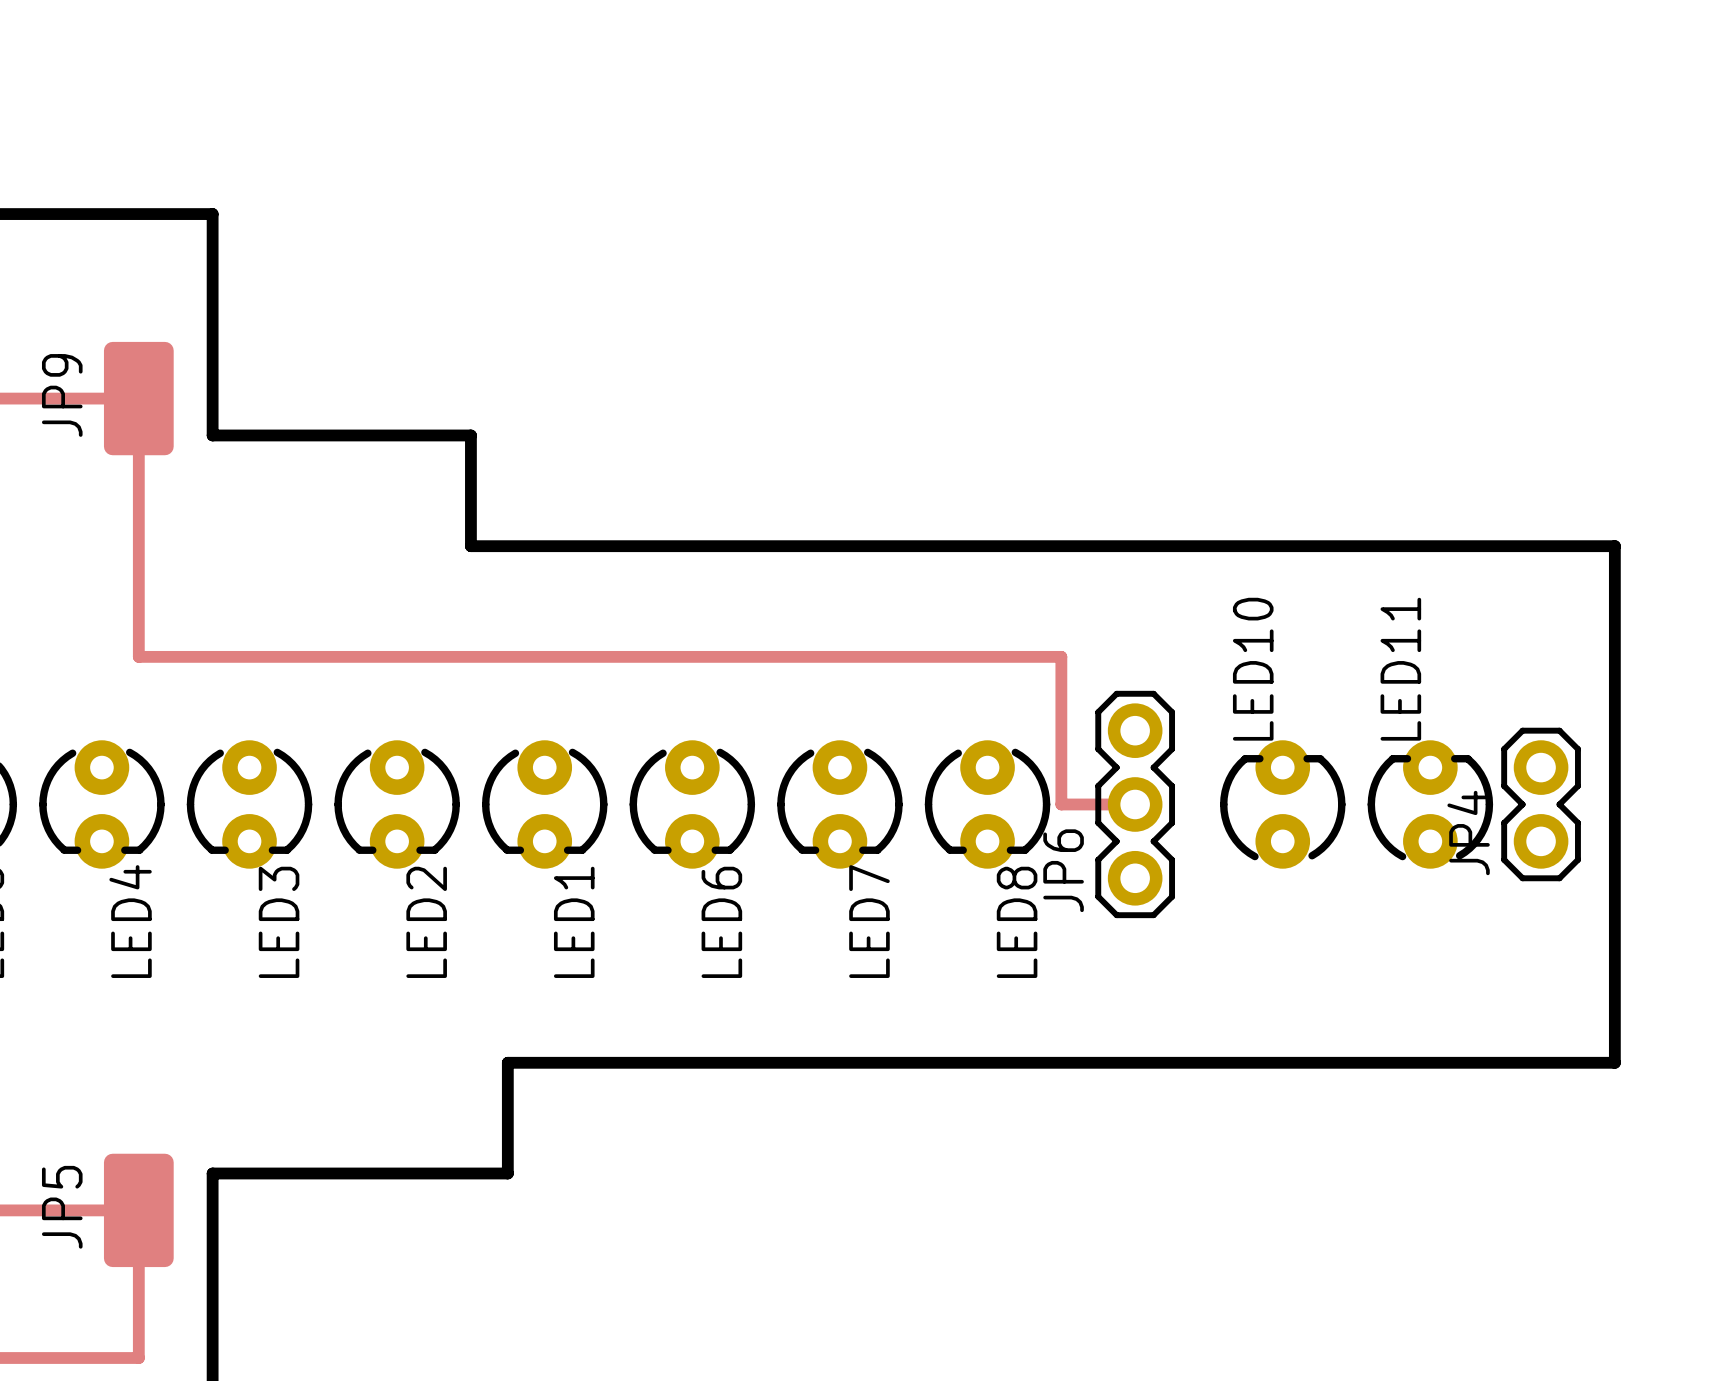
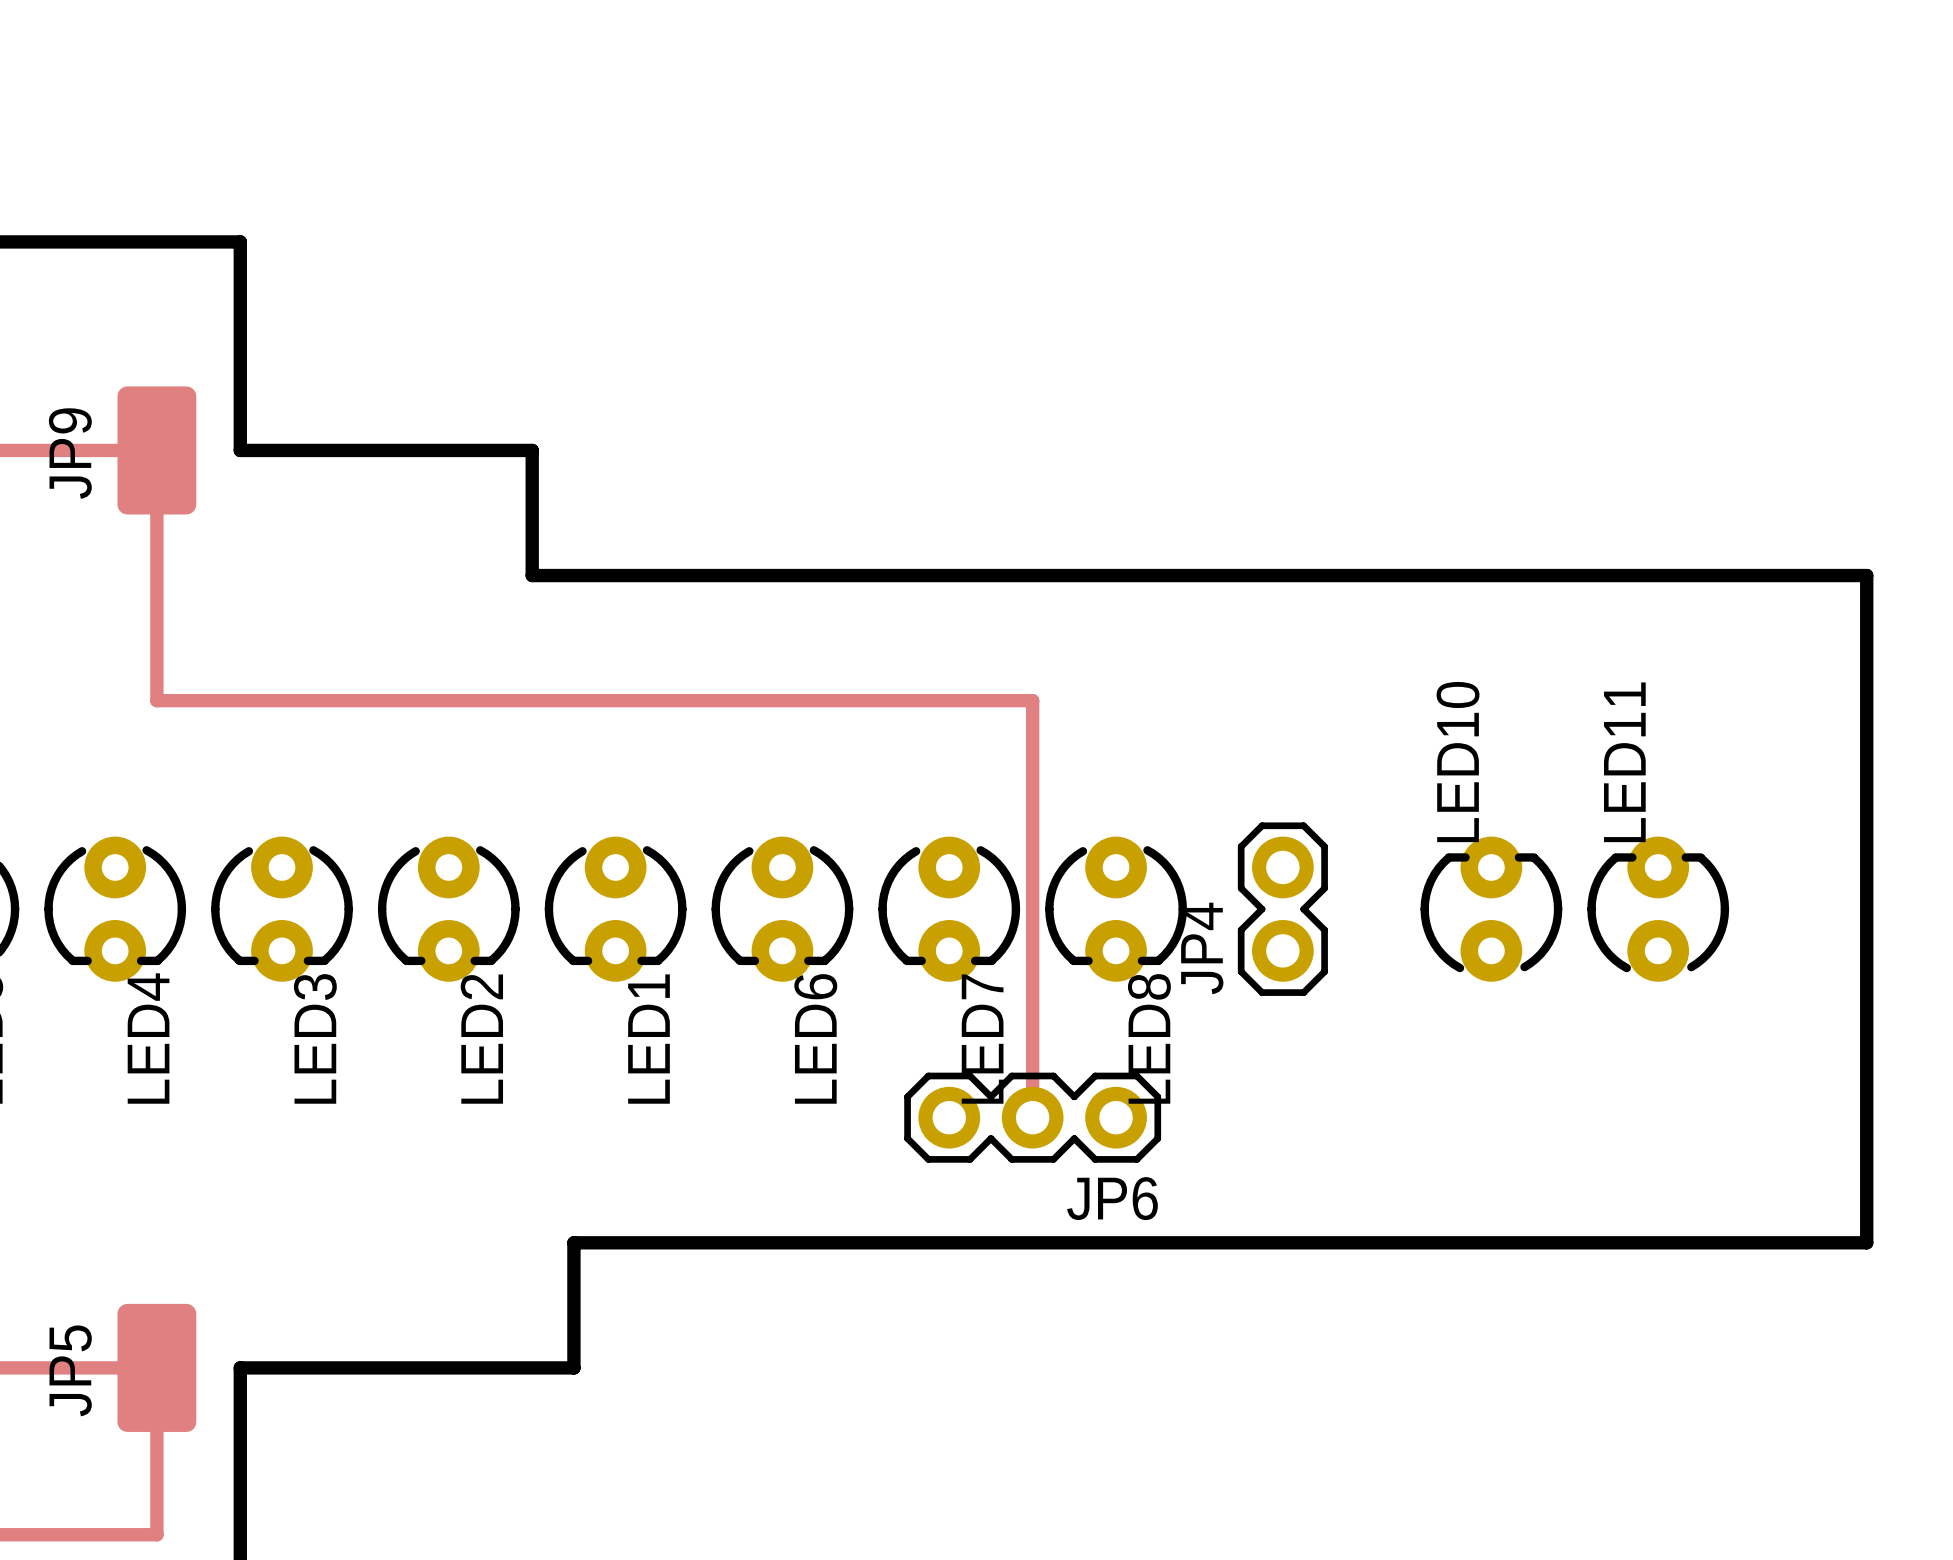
board edge: (212, 398) (212, 435) (470, 435) -> (240, 450) (532, 450) (532, 492)
board edge: (470, 509) (470, 546) (1614, 546) (1614, 1062) (507, 1062) (507, 1099) -> (532, 575) (1866, 575) (1866, 1242) (573, 1242)
track: (138, 619) (138, 656) (1061, 656) (1061, 804) (1135, 804) -> (156, 700) (1032, 700) (1032, 1117)
JP6 rotation: 0° (1135, 804) -> 90° clockwise (1032, 1117)
JP6 position: (1135, 804) -> (1032, 1117)
LED10 position: (1282, 804) -> (1491, 909)
LED11 position: (1430, 804) -> (1658, 909)
JP4 position: (1541, 804) -> (1282, 909)
JP6 name position: JP6 (1063, 870) -> JP6 (1112, 1198)
board edge: (507, 1173) (212, 1173) (212, 1210) -> (573, 1326) (573, 1367) (240, 1367)

